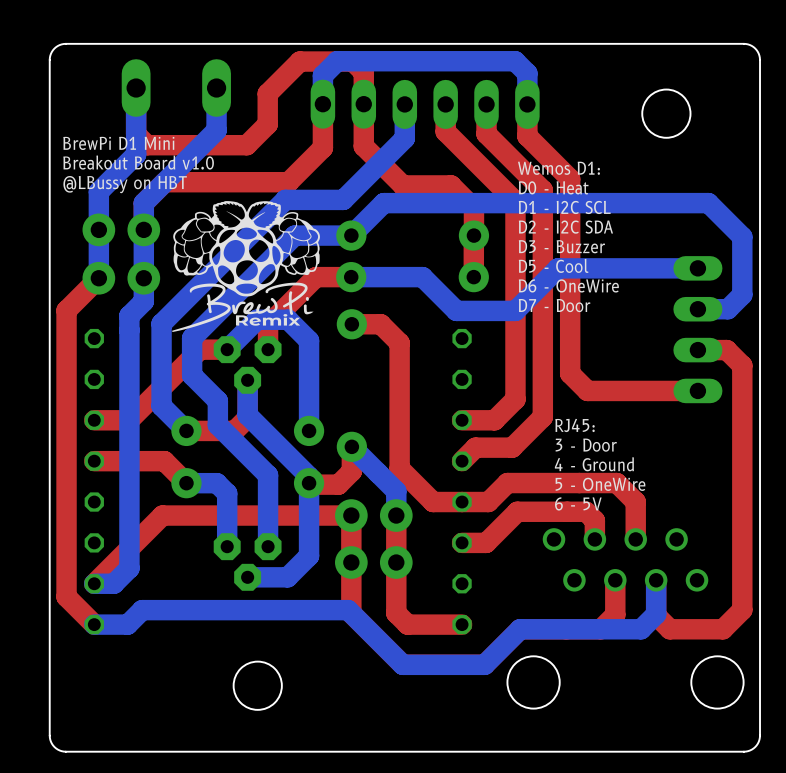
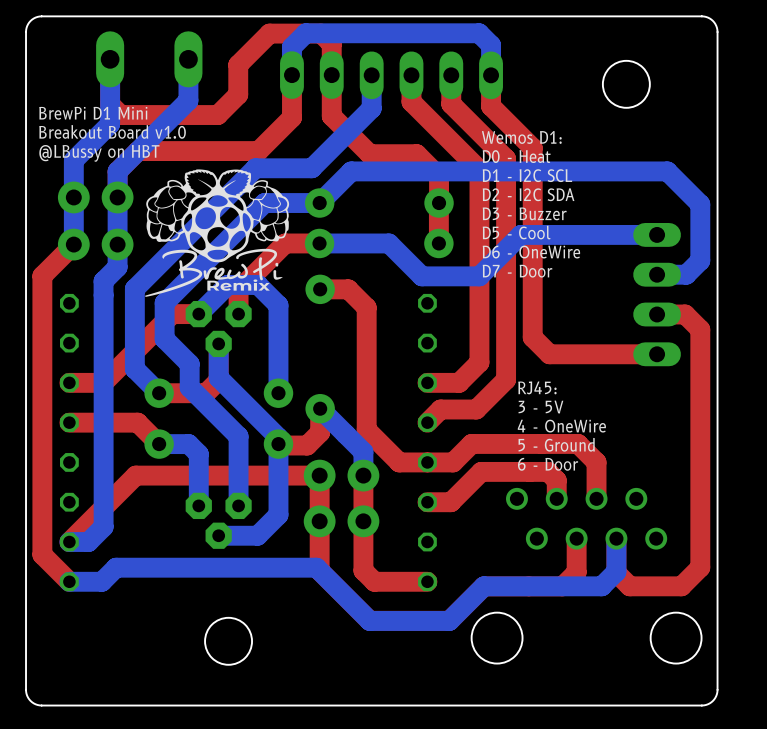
text: 3 - Door (586, 445) -> 3 - 5V (540, 407)
text: 4 - Ground (594, 464) -> 4 - OneWire (561, 426)
text: 5 - OneWire (600, 484) -> 5 - Ground (556, 444)
text: 6 - 5V (578, 503) -> 6 - Door (548, 464)

